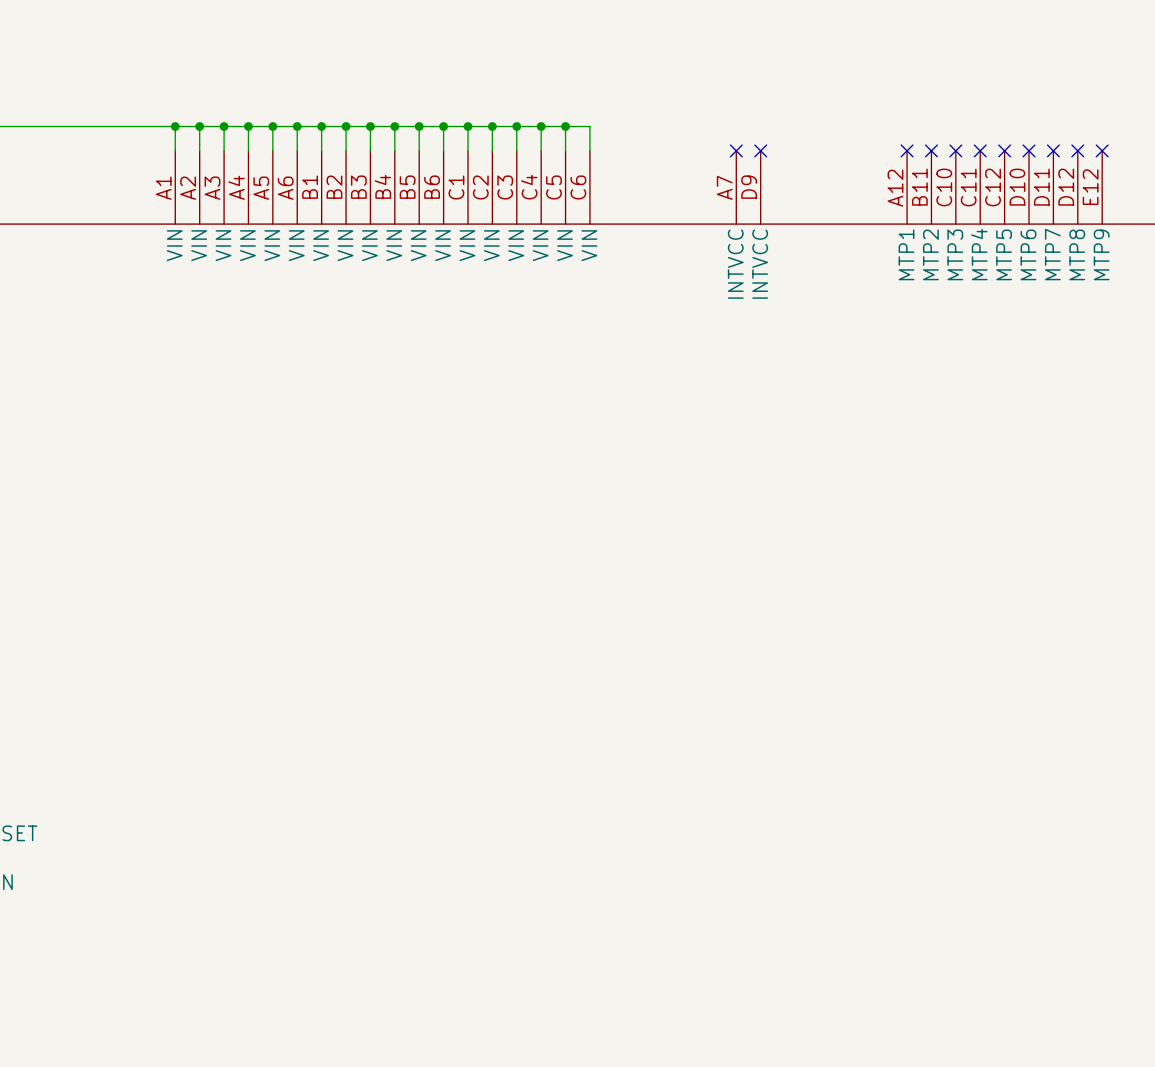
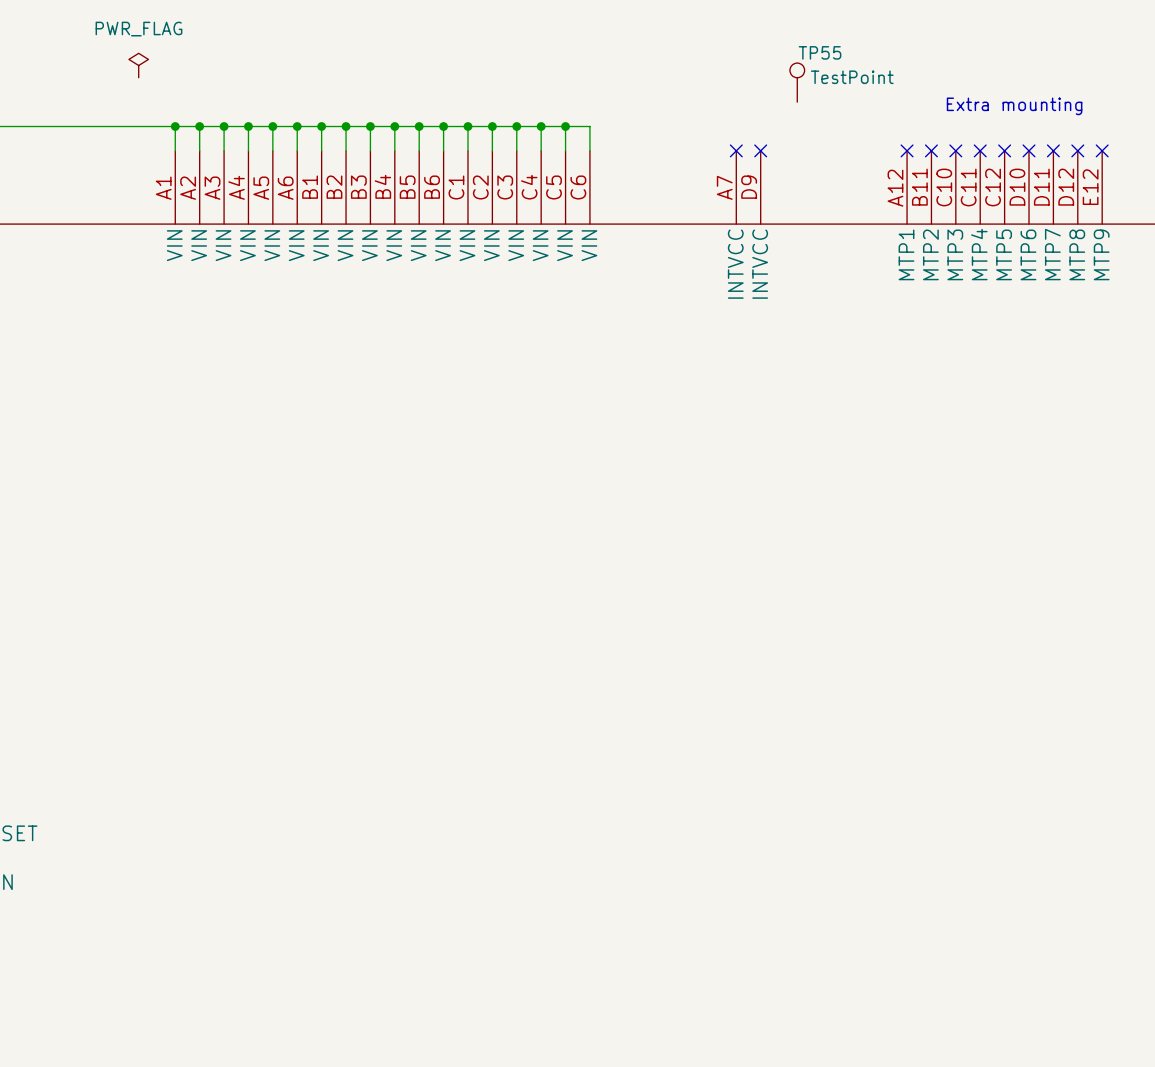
power symbol: none -> PWR_FLAG (138, 65)
TP55: none -> TestPoint (797, 82)
text: none -> Extra mounting (1014, 106)

